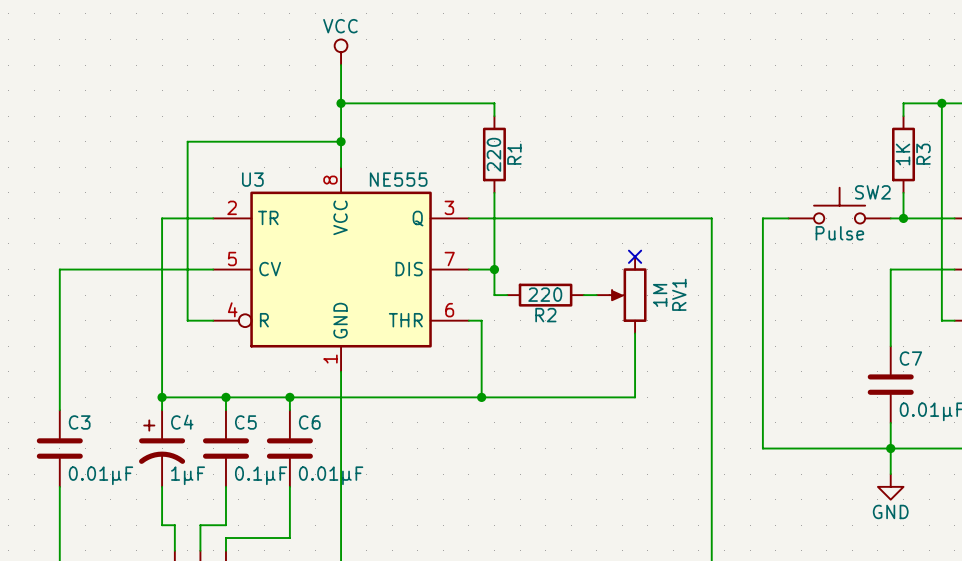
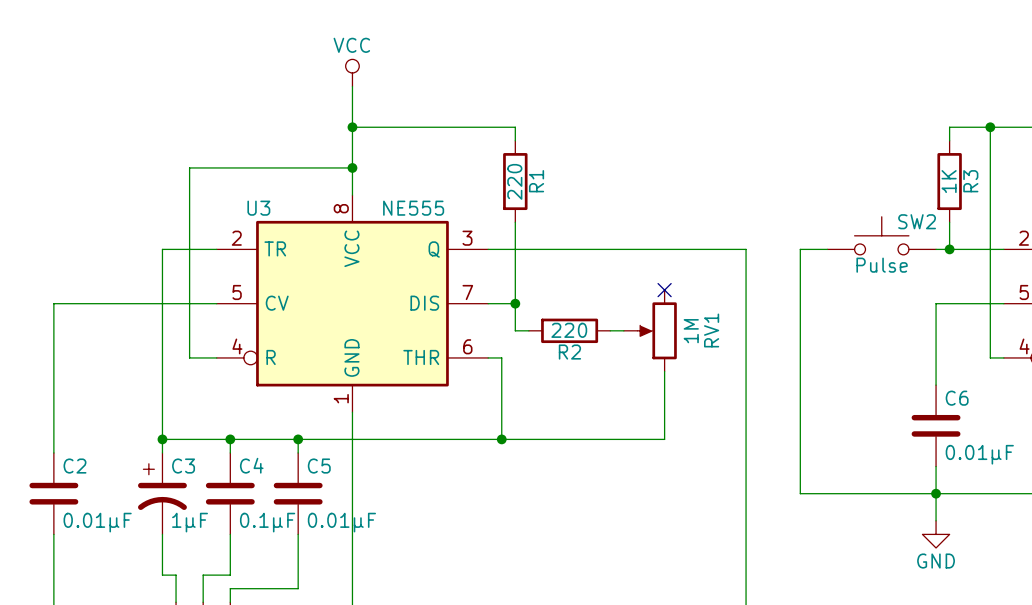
C7 name: C7 (910, 358) -> C6 (957, 398)
C3 name: C3 (79, 422) -> C2 (74, 466)
C4 name: C4 (182, 422) -> C3 (183, 466)
C5 name: C5 (245, 422) -> C4 (251, 465)
C6 name: C6 (309, 422) -> C5 (319, 466)

